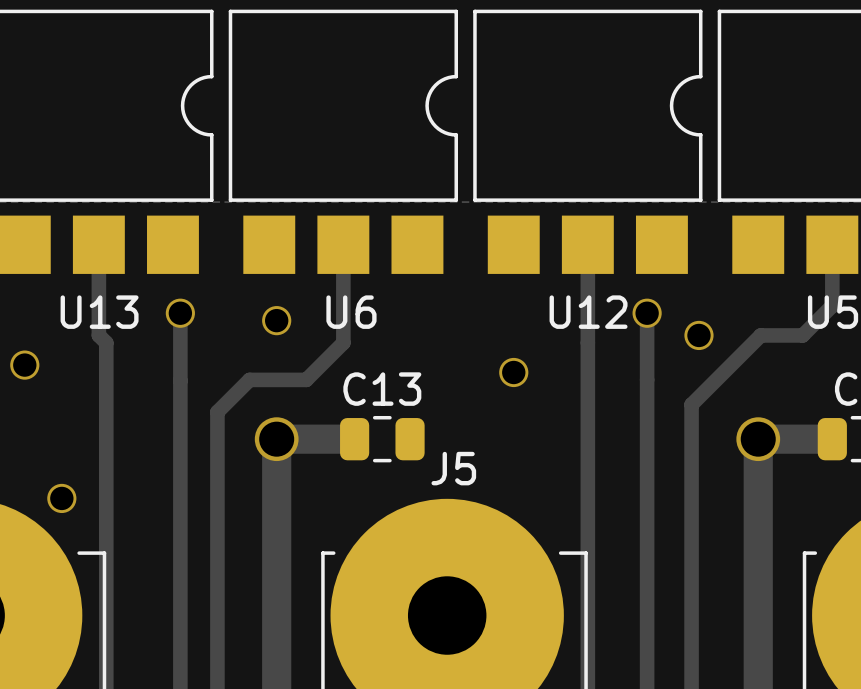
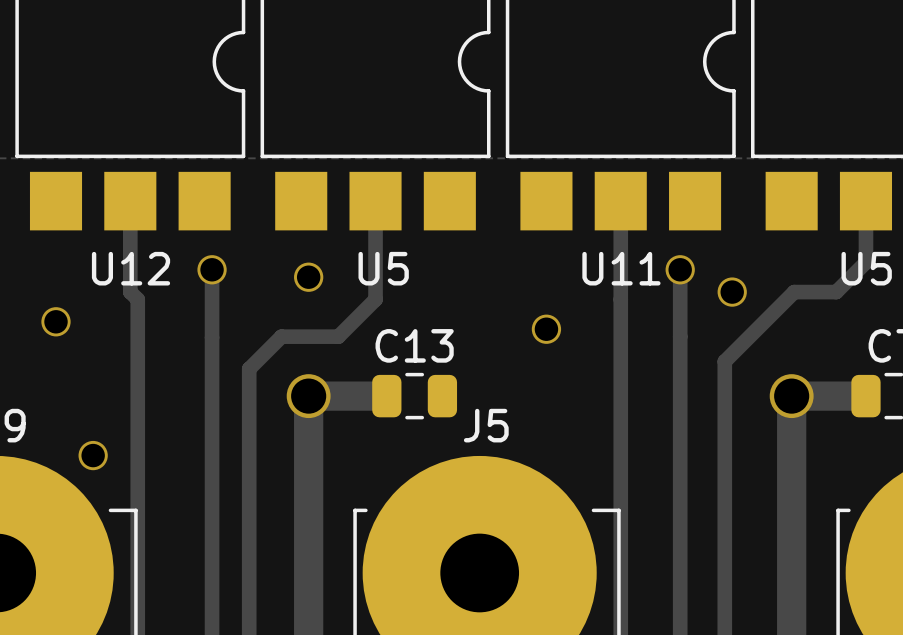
U13 name: U13 (99, 312) -> U12 (131, 268)
U6 name: U6 (351, 312) -> U5 (383, 268)
U12 name: U12 (588, 312) -> U11 (621, 268)

